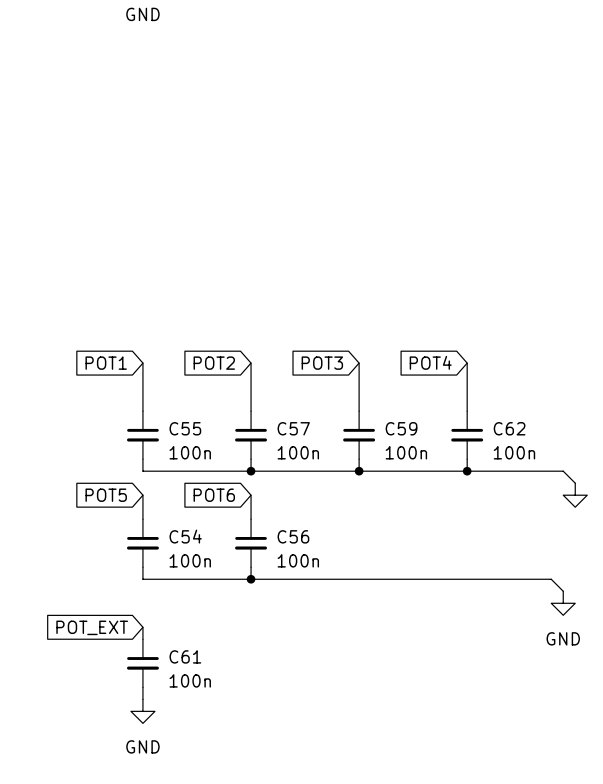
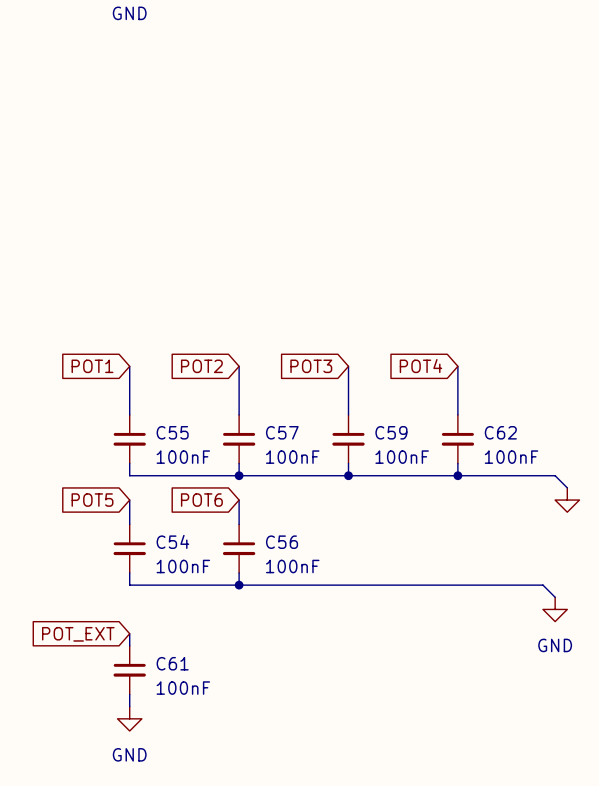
C55 value: 100n (190, 452) -> 100nF (183, 457)
C57 value: 100n (298, 452) -> 100nF (292, 457)
C59 value: 100n (406, 452) -> 100nF (402, 457)
C62 value: 100n (514, 452) -> 100nF (511, 457)
C54 value: 100n (190, 560) -> 100nF (183, 566)
C56 value: 100n (298, 560) -> 100nF (292, 566)
C61 value: 100n (190, 680) -> 100nF (183, 688)

